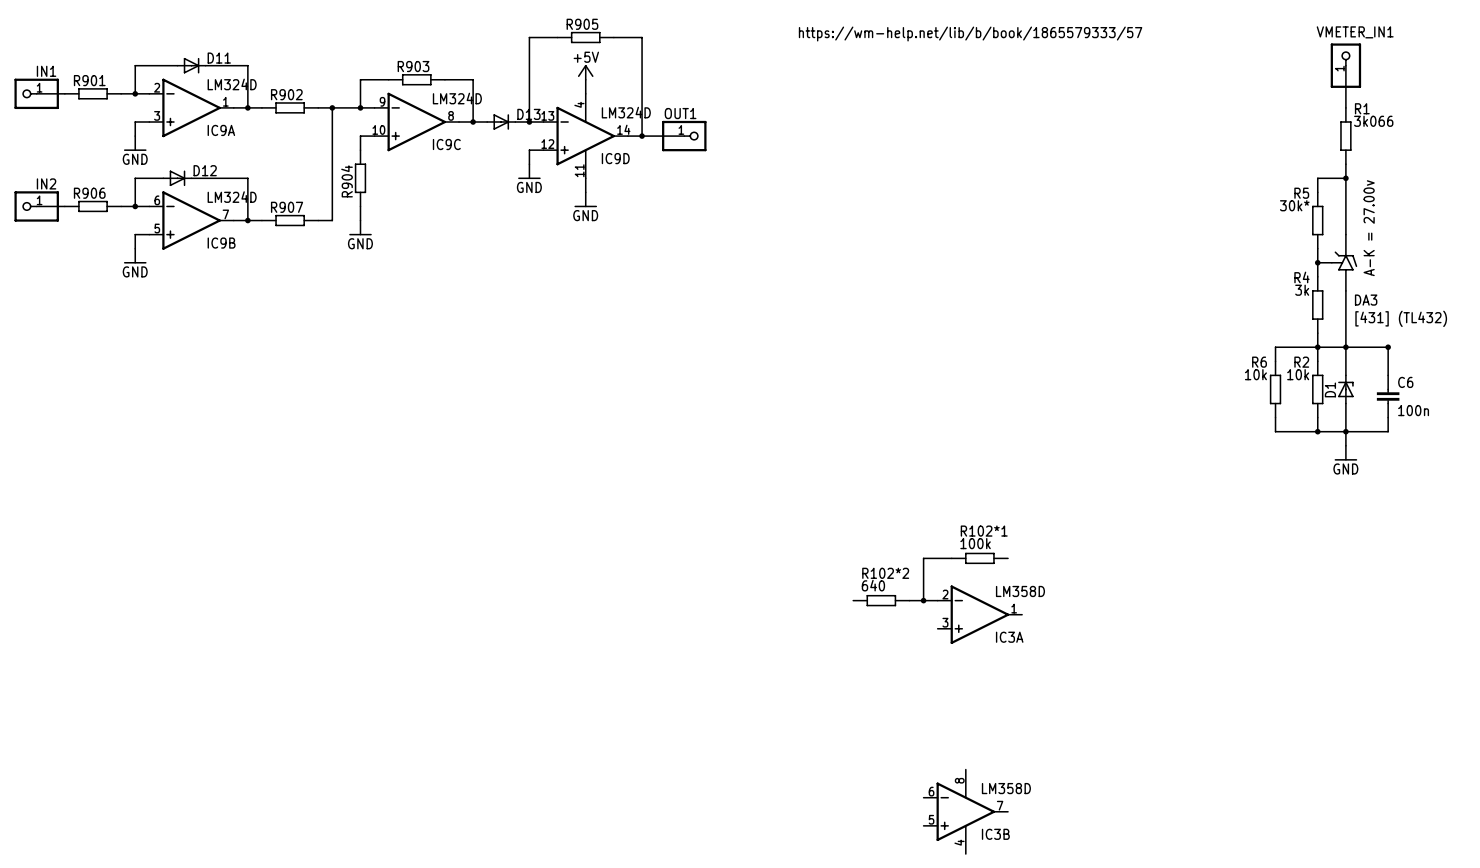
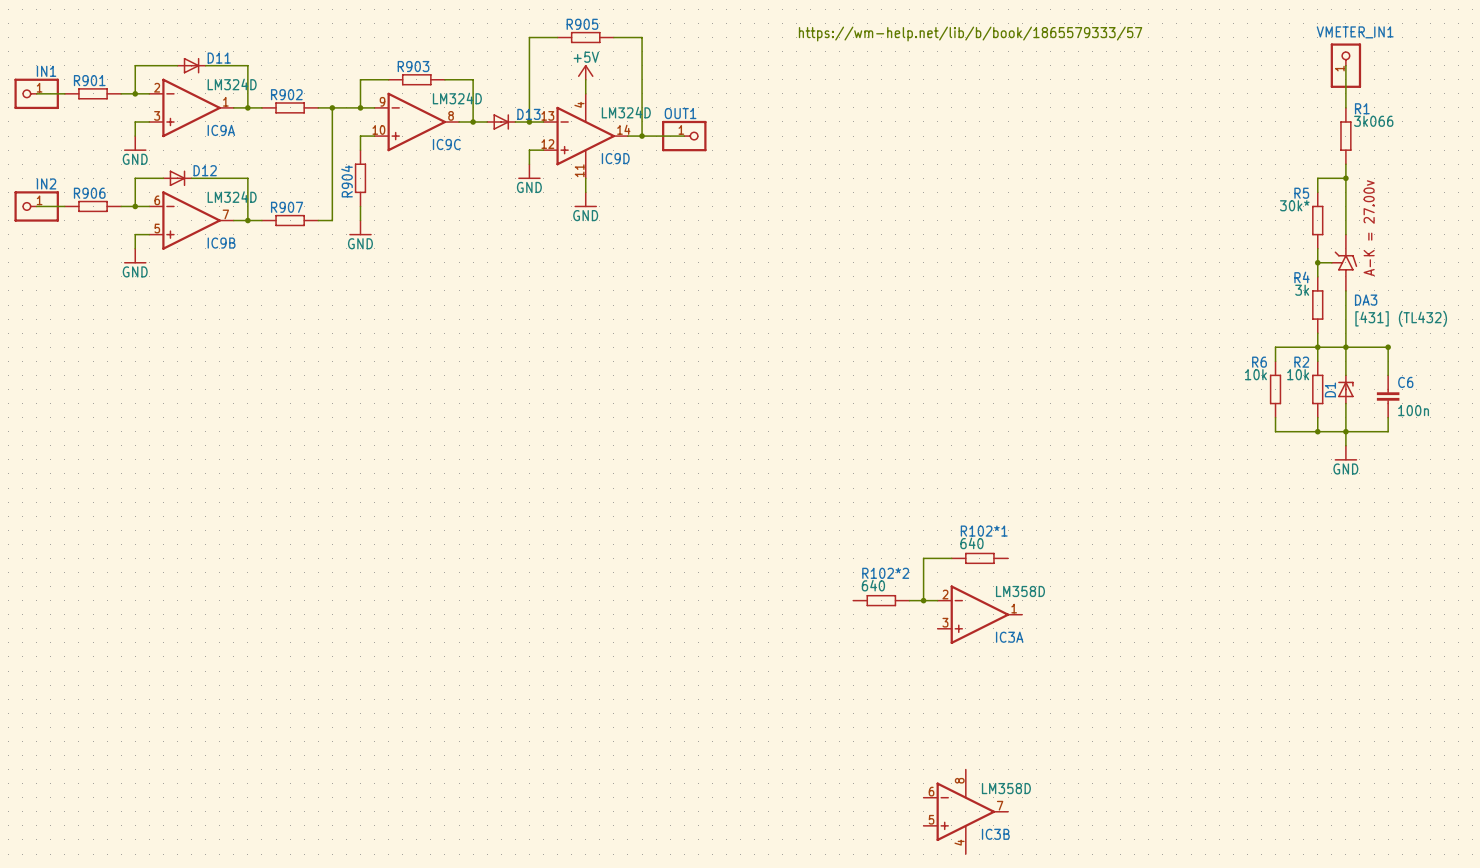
R102*1 value: 100k (975, 543) -> 640 (971, 543)

